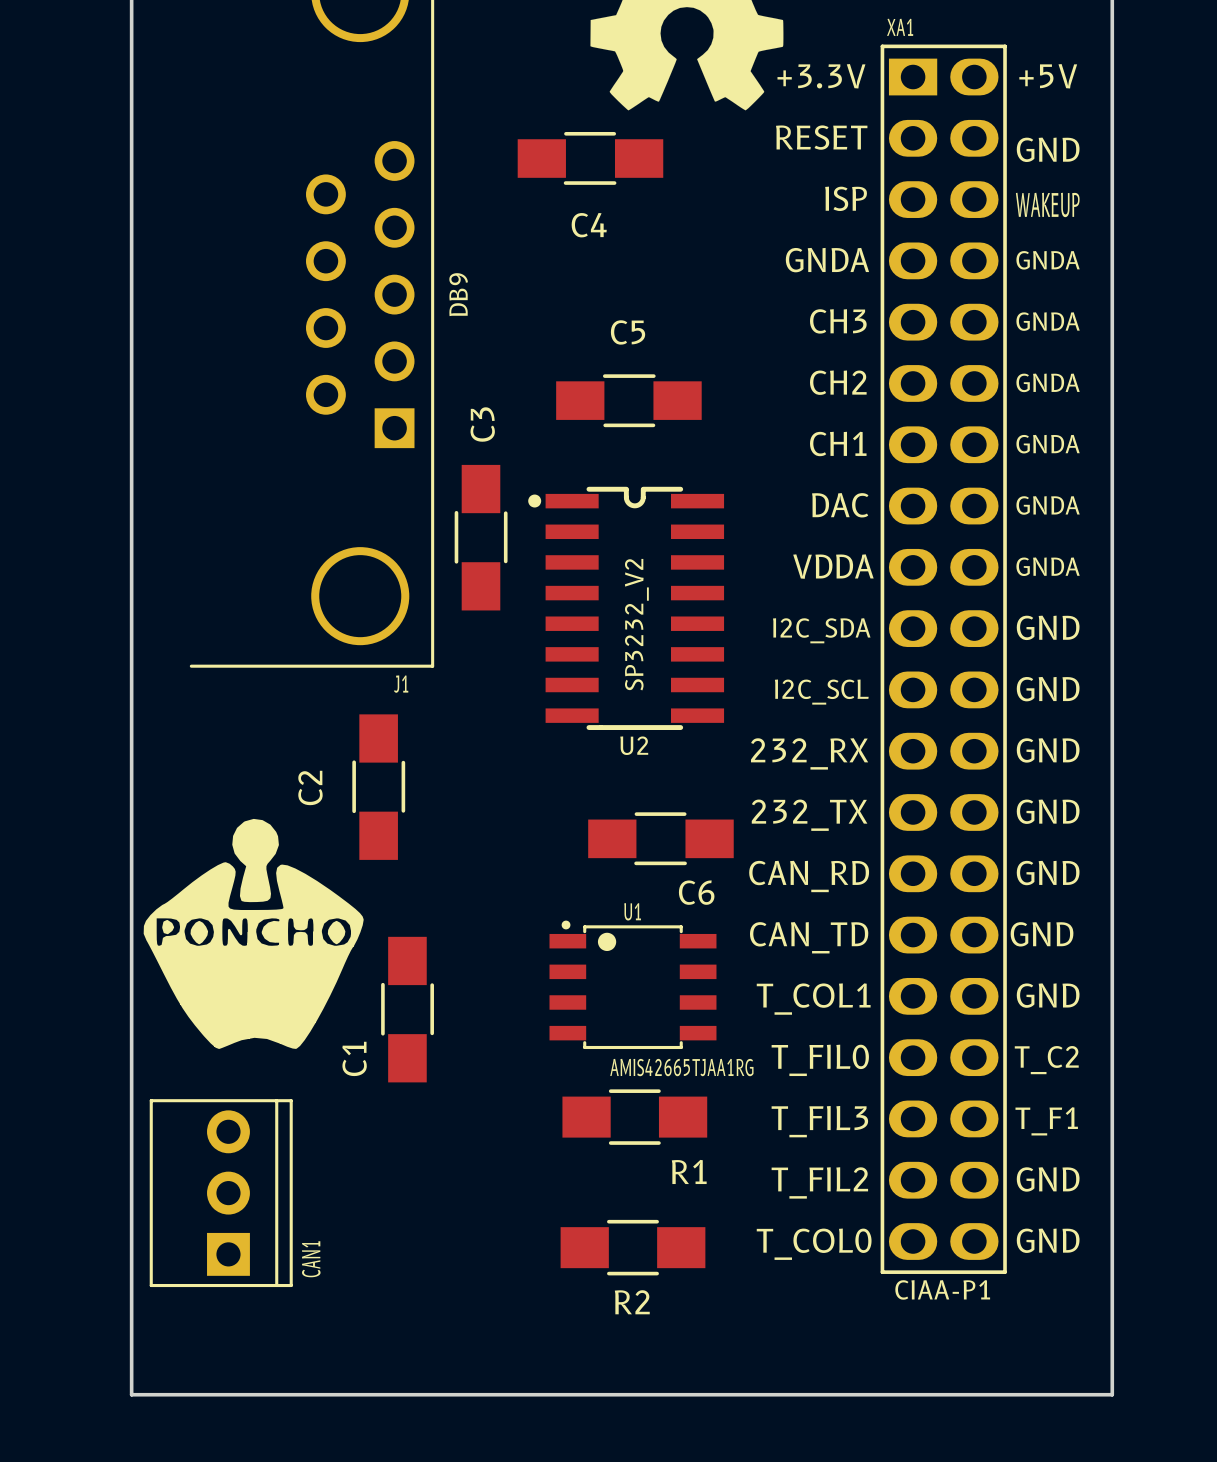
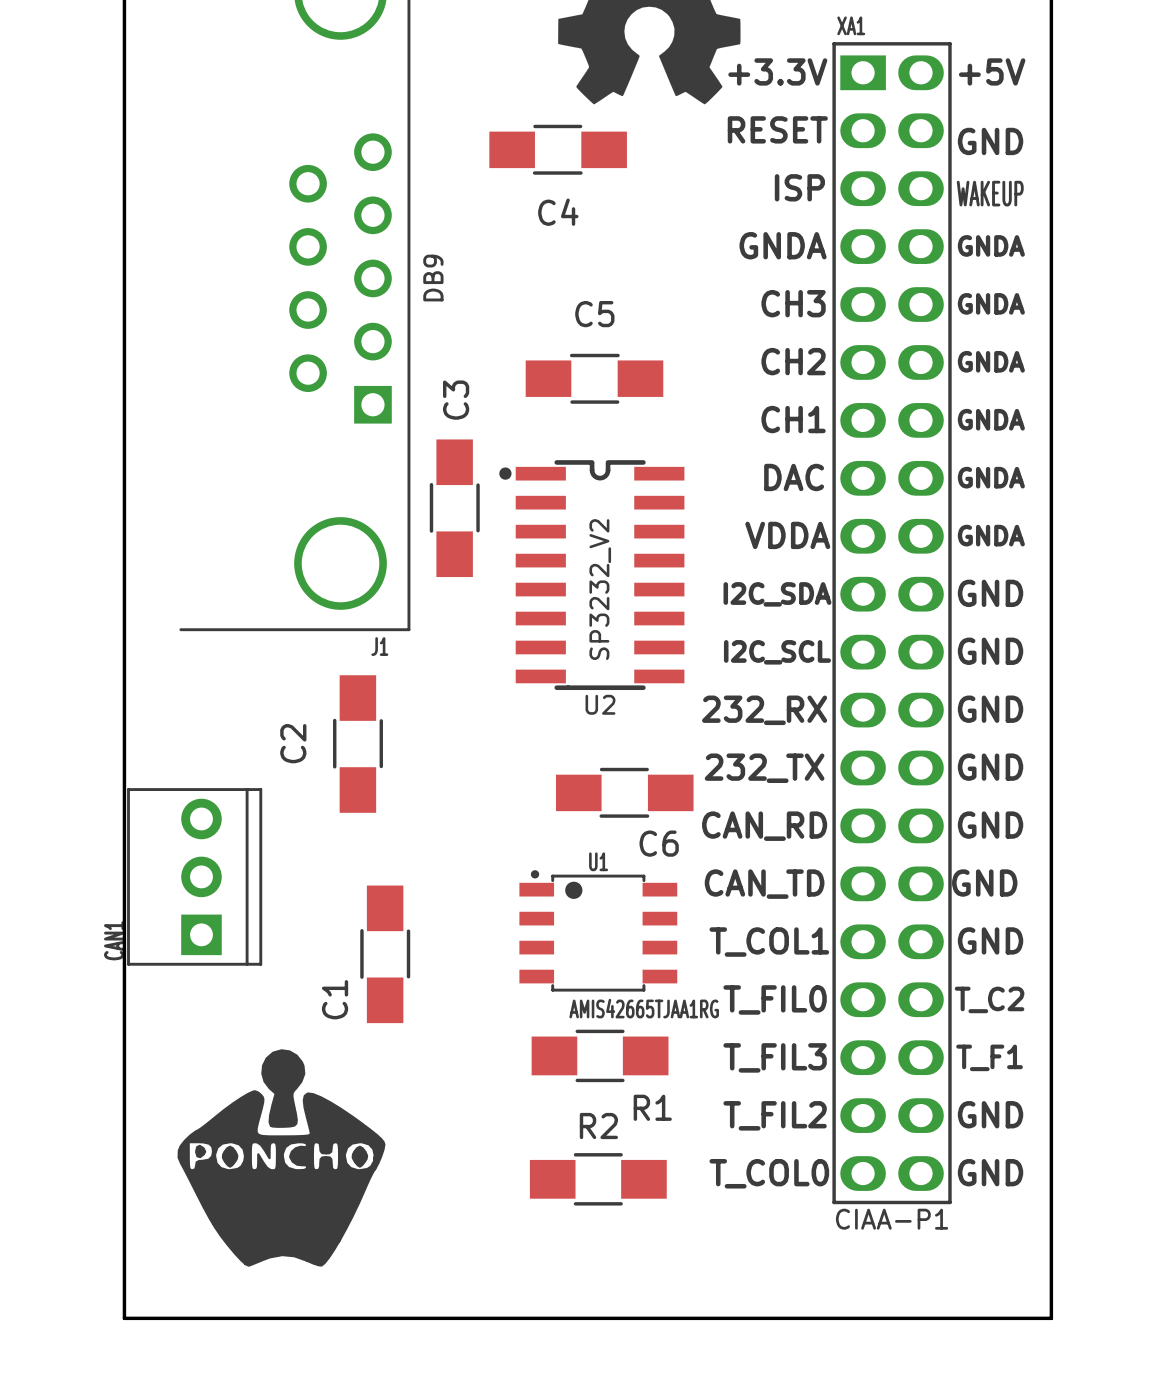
drawing position: (253, 933) -> (281, 1157)
CAN1 position: (221, 1193) -> (194, 876)
CAN1 name position: CAN1 (311, 1259) -> CAN1 (114, 940)
R2 name position: R2 (632, 1302) -> R2 (598, 1126)

